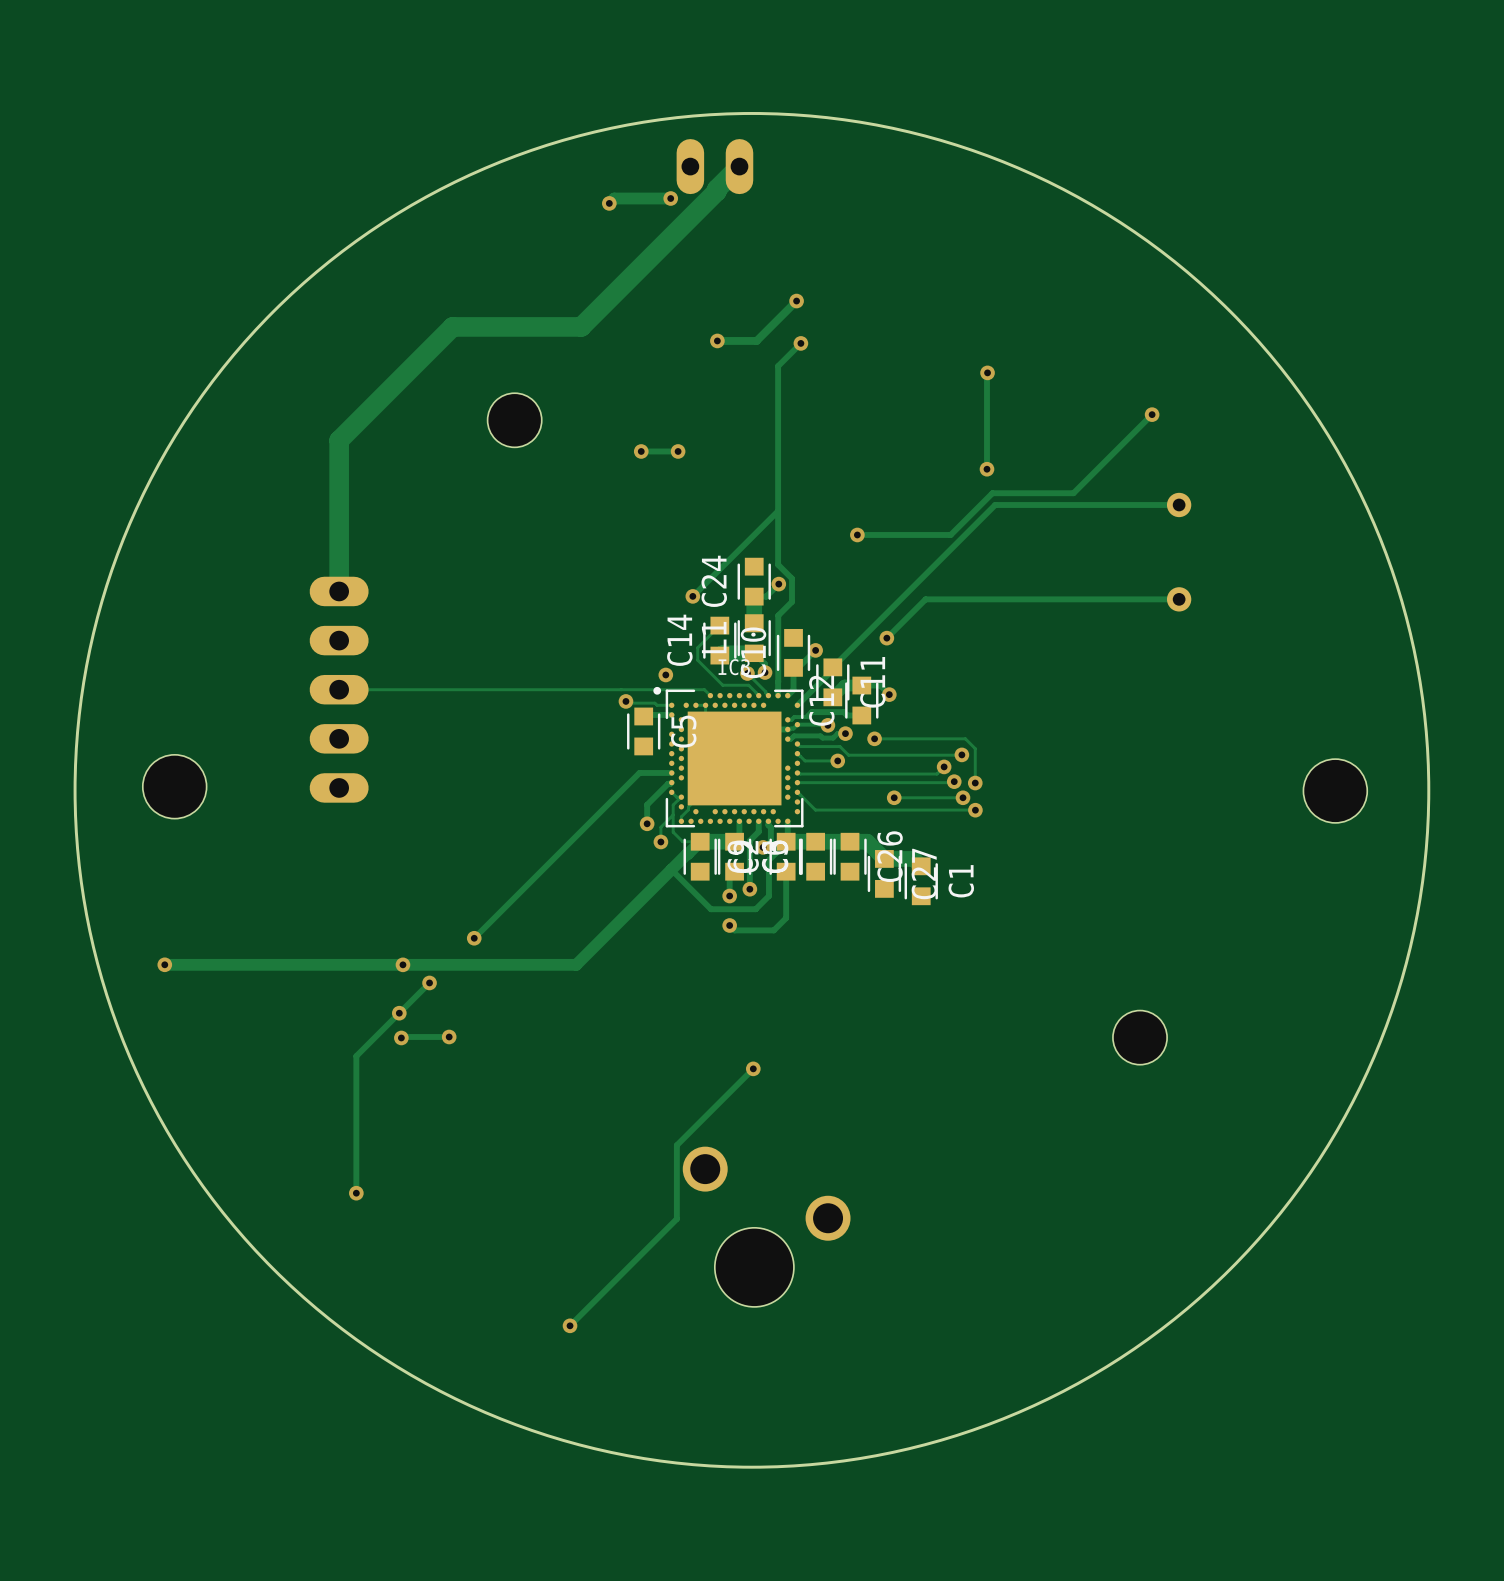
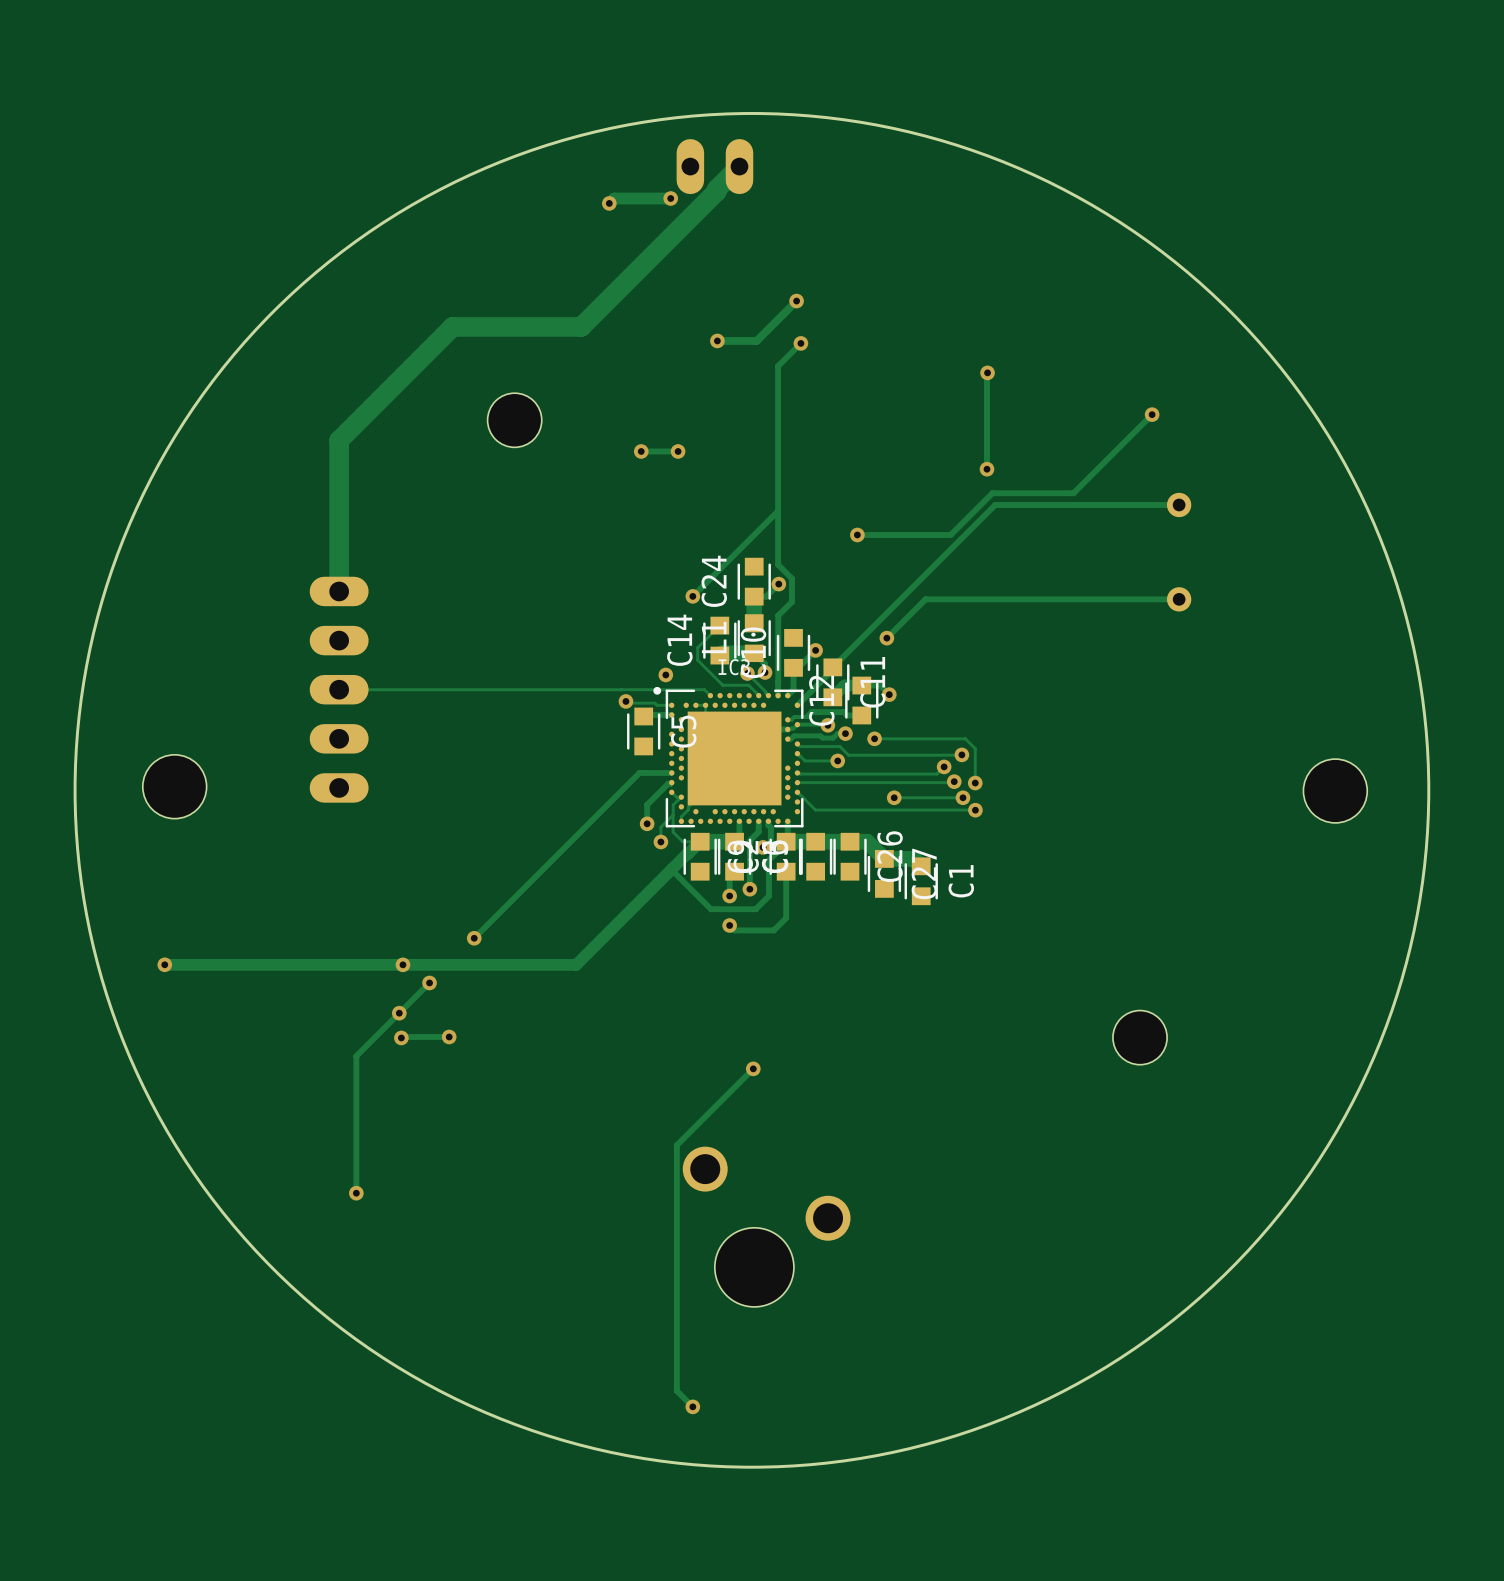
track: (676, 1218) (570, 1325) -> (676, 1218) (676, 1390) (692, 1406)
via: (570, 1325) -> none
via: none -> (692, 1406)

